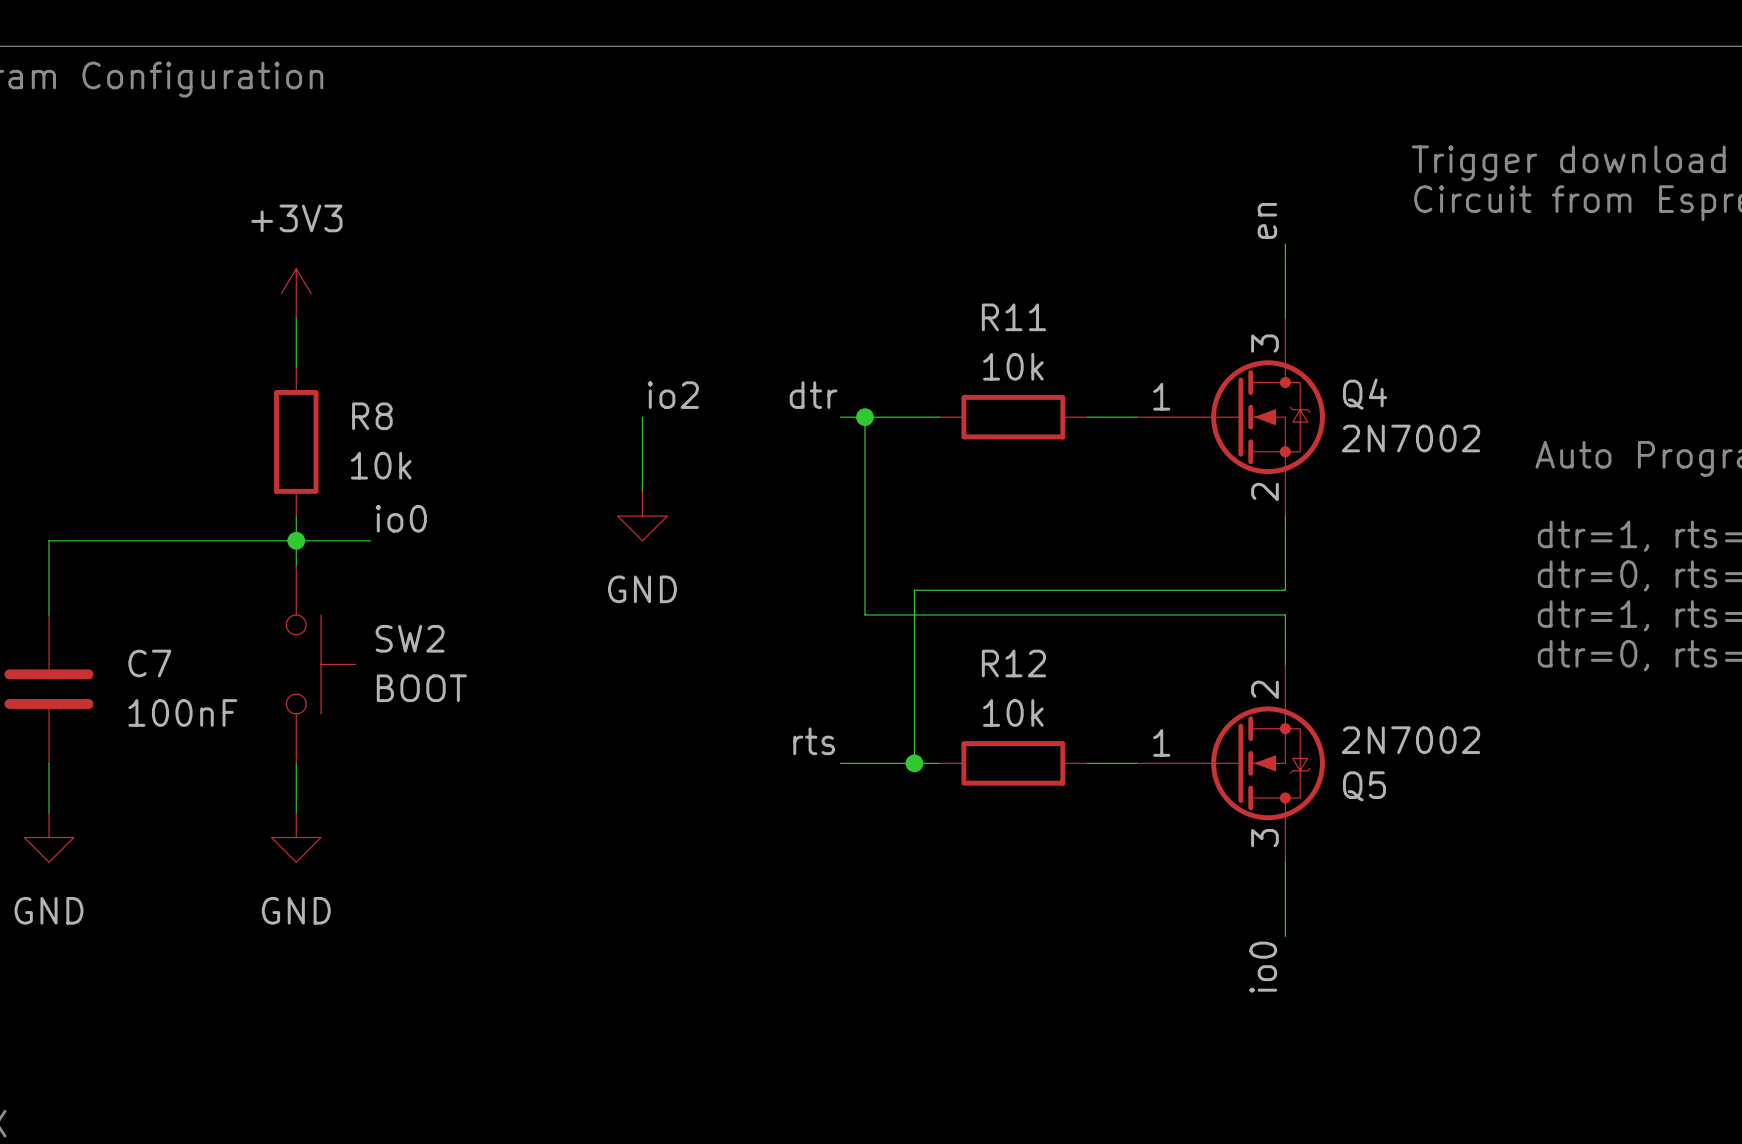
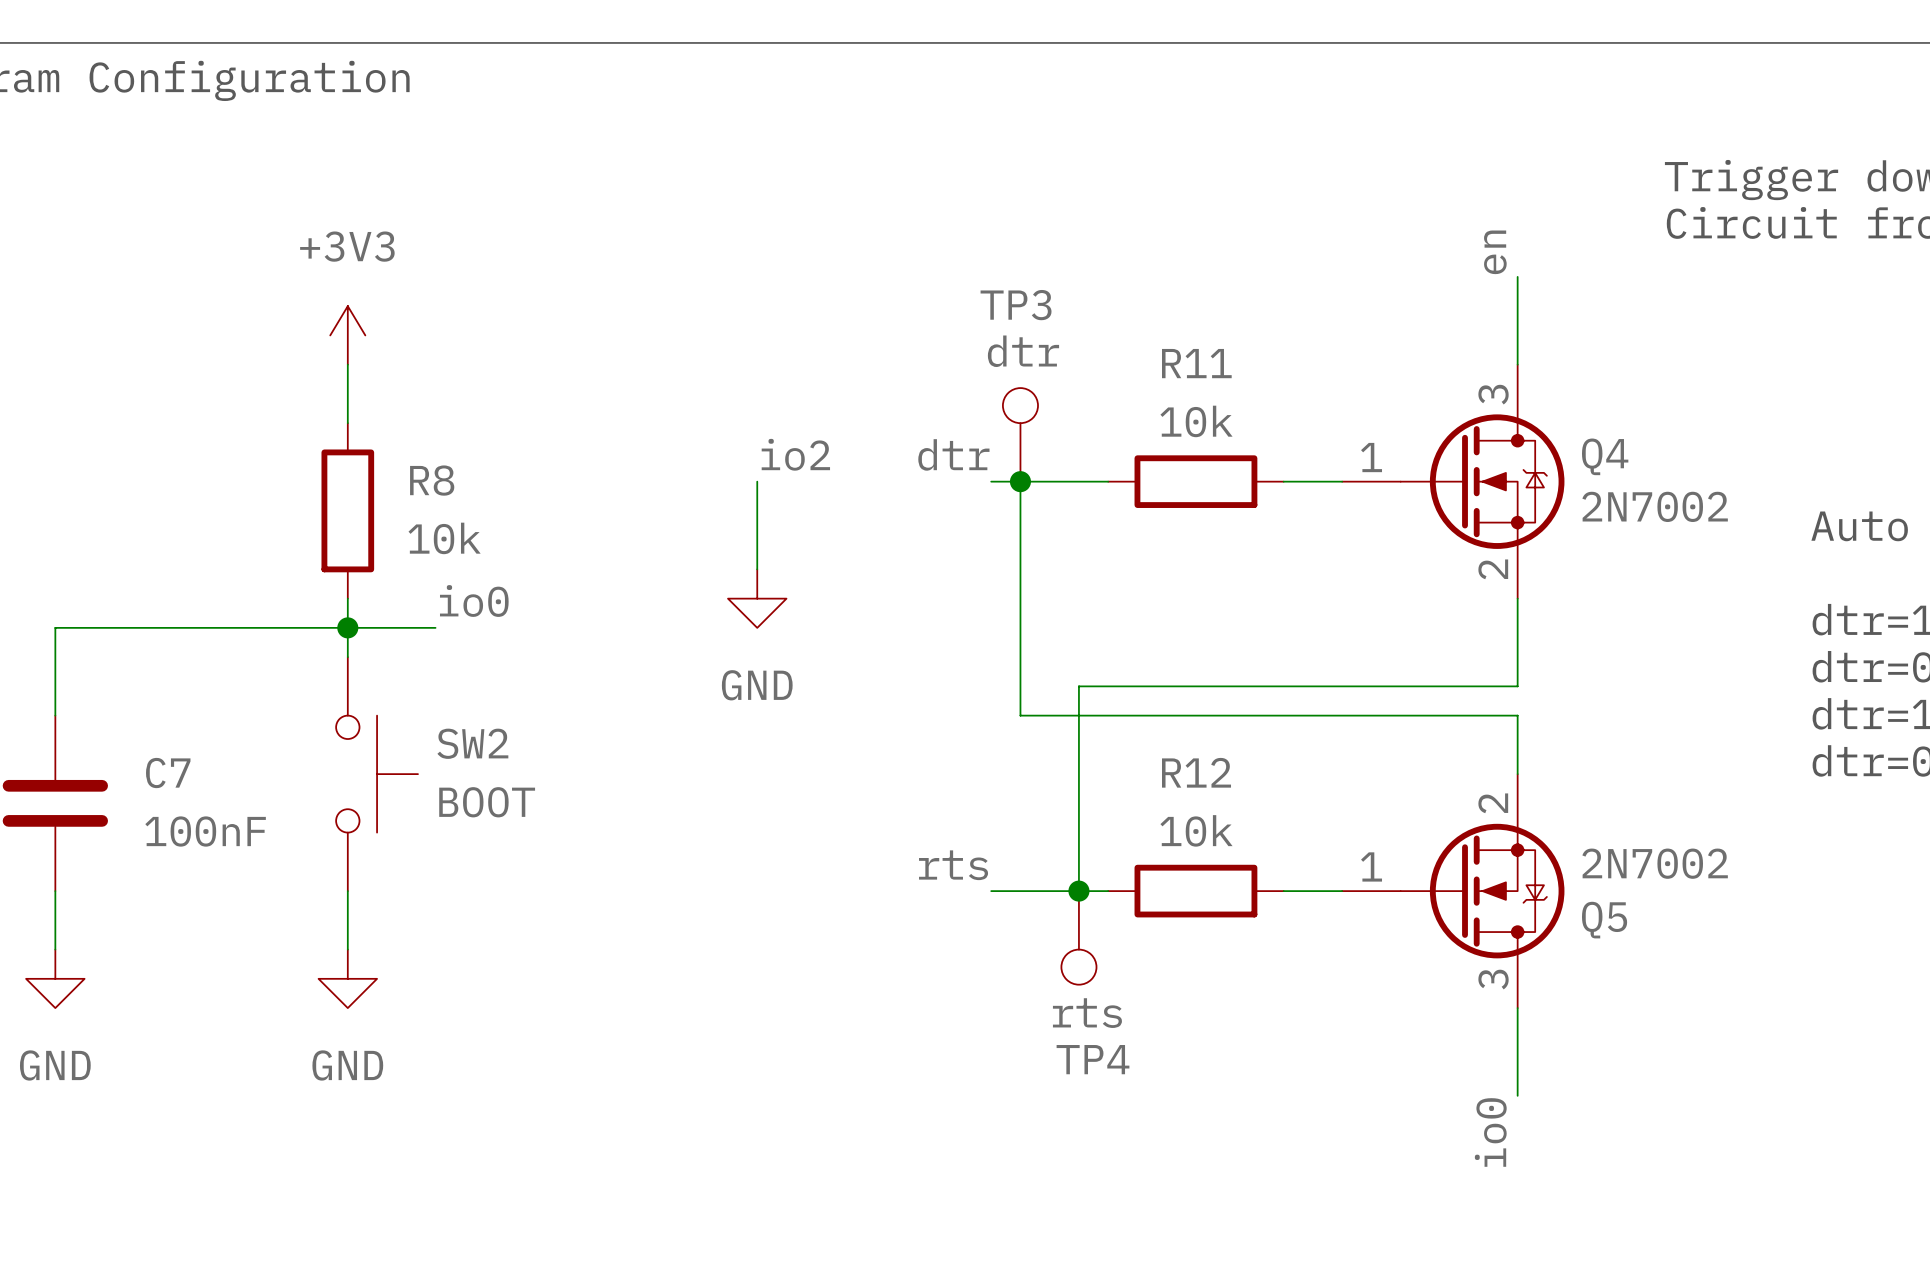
TP3: none -> dtr (1020, 434)
TP4: none -> rts (1078, 937)

